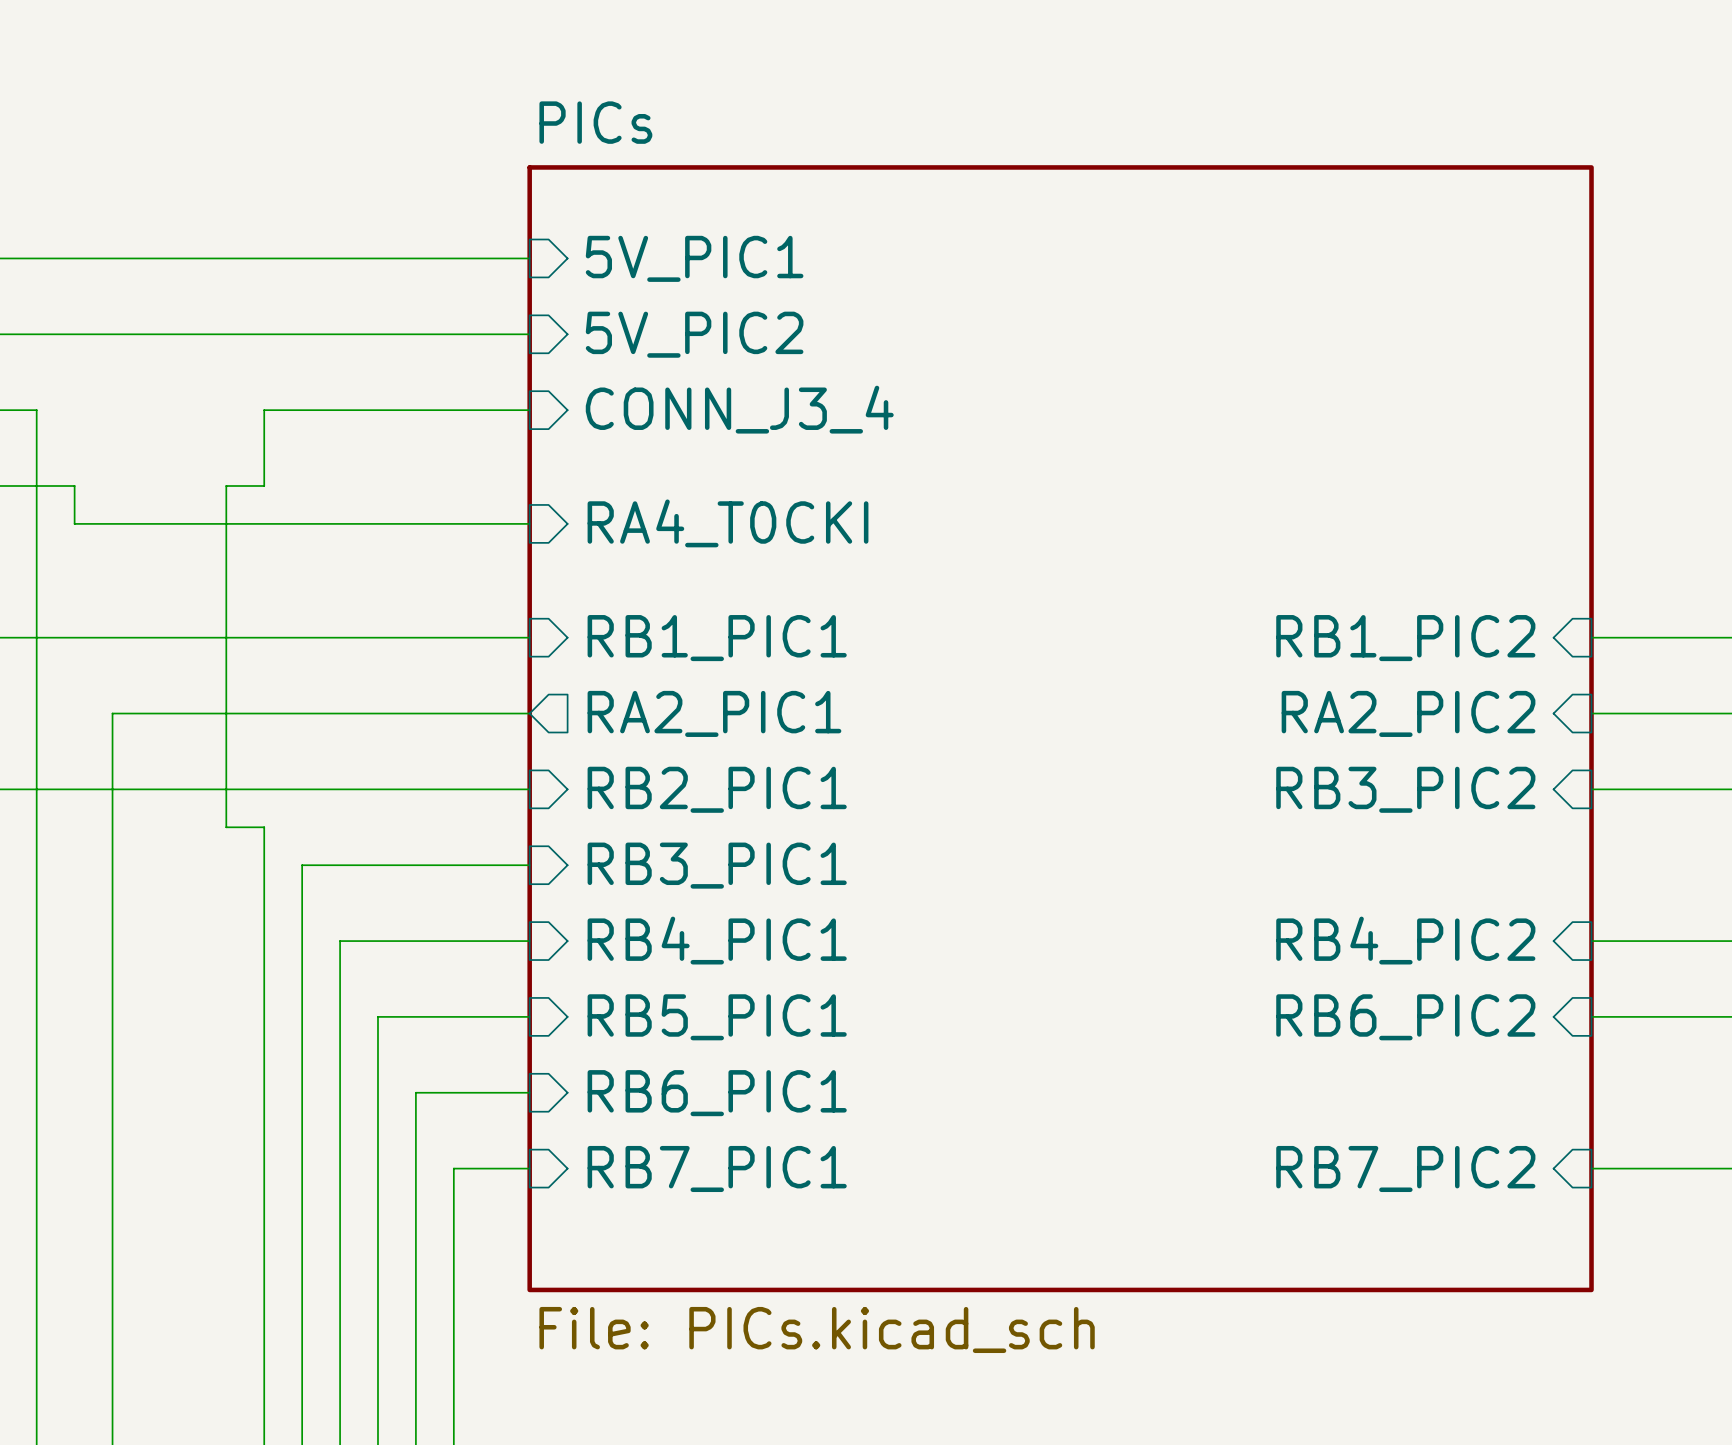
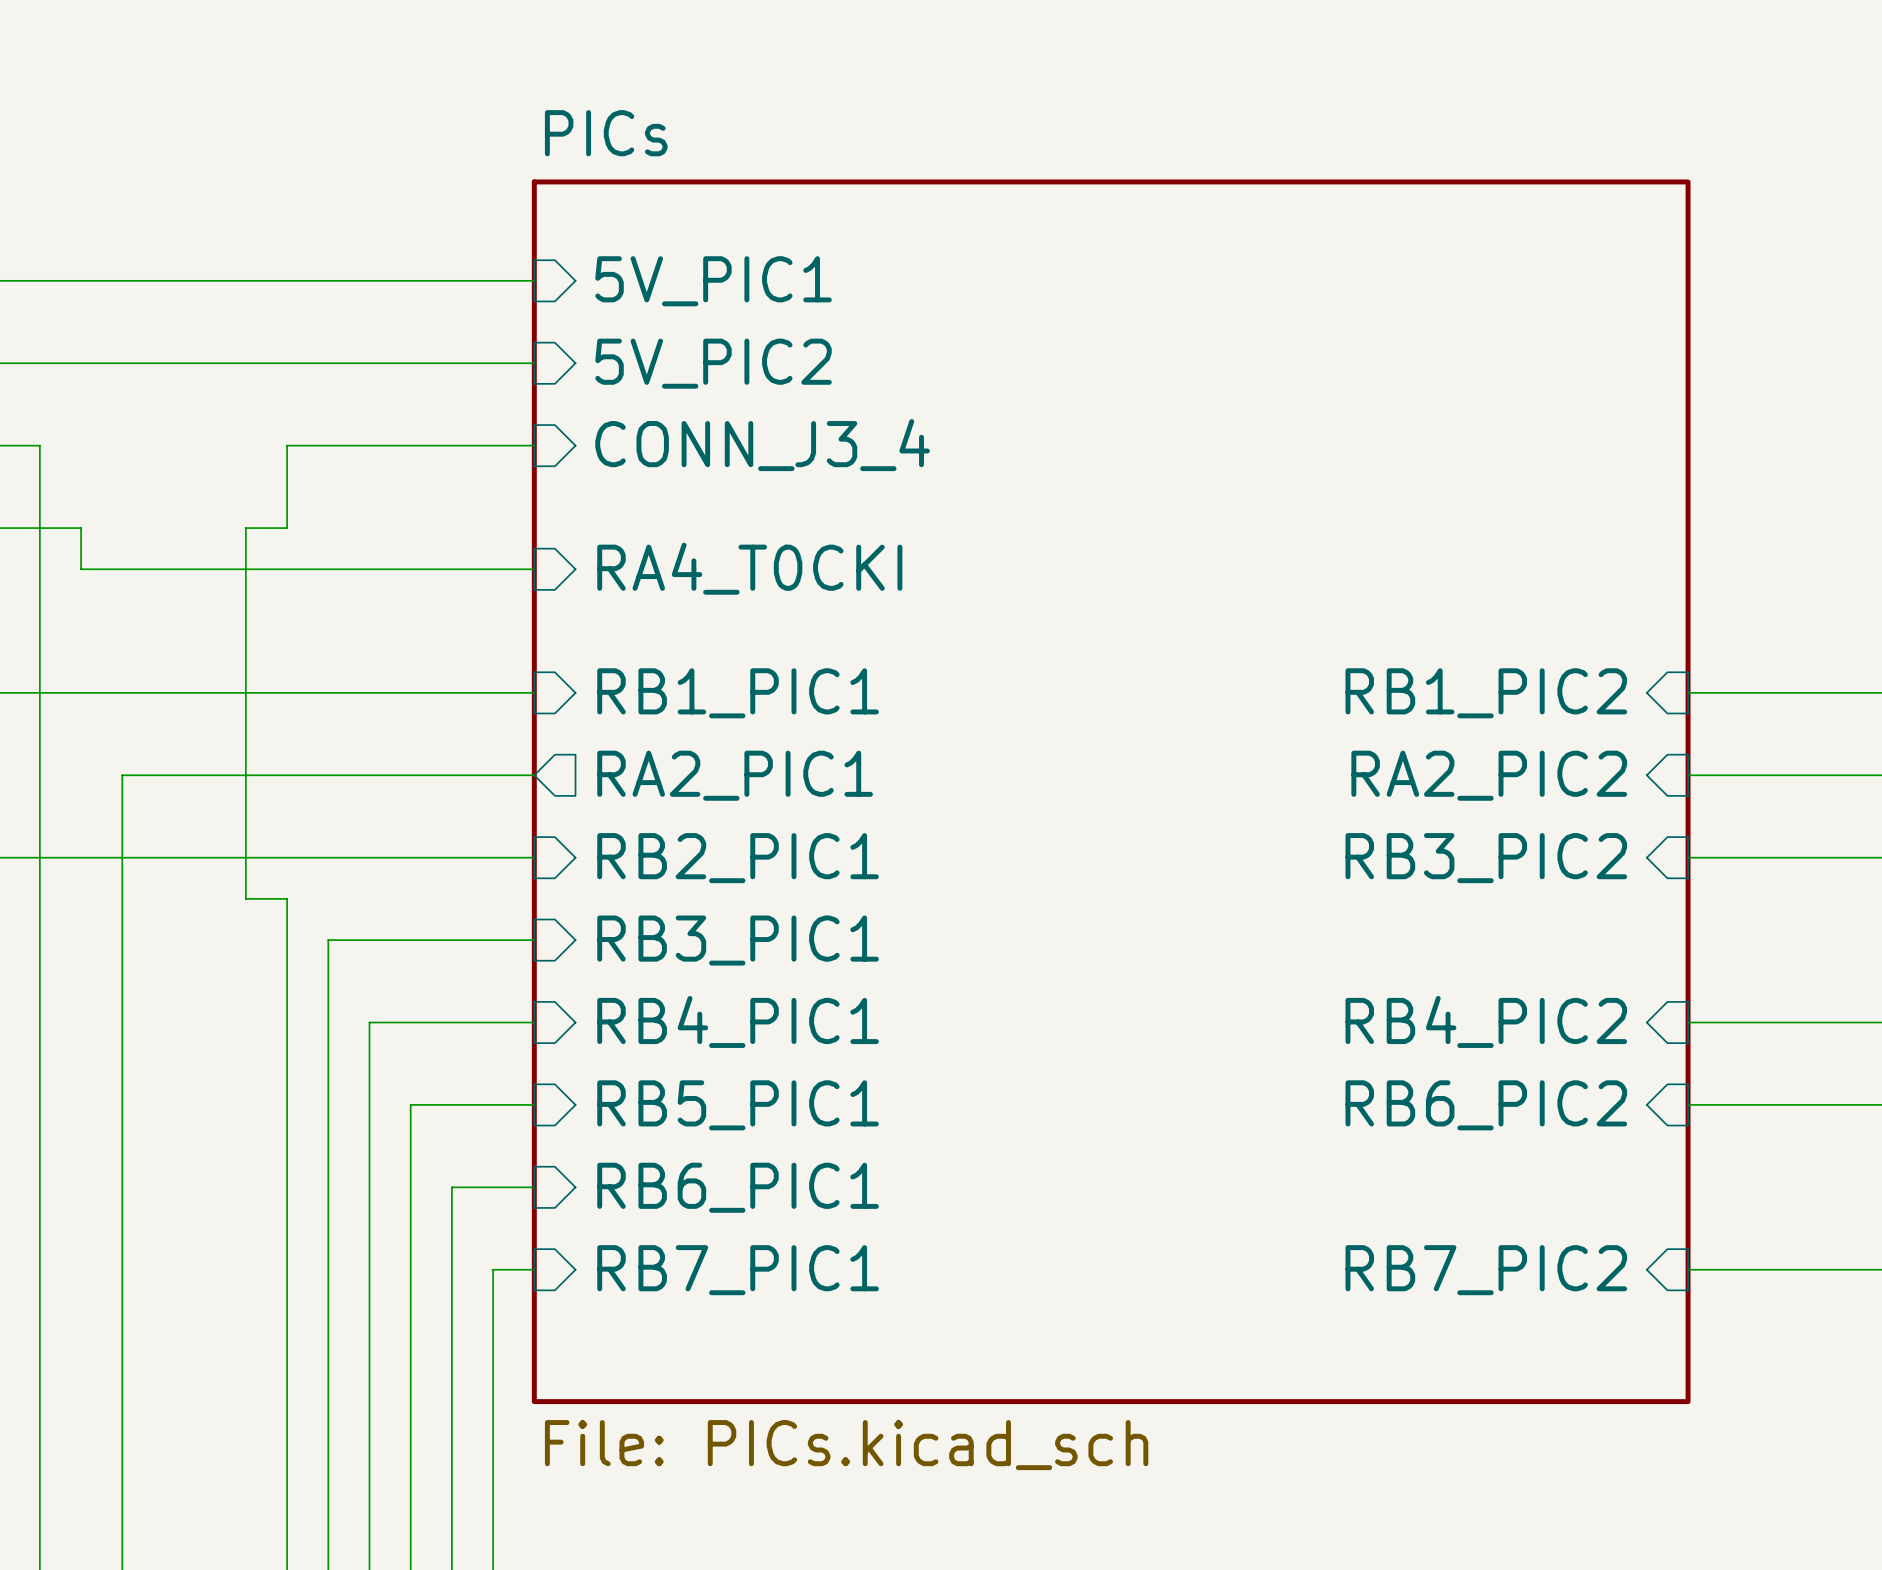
wire: (491, 258) (529, 258) -> none
sheet pin position: 5V_PIC1 (694, 258) -> 5V_PIC1 (713, 281)
wire: (491, 334) (529, 334) -> none
sheet pin position: 5V_PIC2 (694, 334) -> 5V_PIC2 (713, 363)
sheet pin position: CONN_J3_4 (739, 409) -> CONN_J3_4 (762, 445)
wire: (491, 410) (529, 410) -> none
wire: (491, 523) (529, 523) -> none
sheet pin position: RA4_T0CKI (728, 523) -> RA4_T0CKI (749, 568)
wire: (491, 637) (529, 637) -> none
wire: none -> (1688, 692) (1729, 692)
sheet pin position: RB1_PIC1 (717, 638) -> RB1_PIC1 (738, 693)
sheet pin position: RB1_PIC2 (1405, 638) -> RB1_PIC2 (1486, 693)
wire: (491, 713) (529, 713) -> none
sheet pin position: RA2_PIC1 (714, 713) -> RA2_PIC1 (735, 775)
sheet pin position: RA2_PIC2 (1408, 713) -> RA2_PIC2 (1489, 775)
wire: none -> (1688, 775) (1729, 775)
sheet PICs position: (1060, 728) -> (1111, 791)
wire: (491, 789) (529, 789) -> none
sheet pin position: RB2_PIC1 (717, 789) -> RB2_PIC1 (738, 858)
sheet pin position: RB3_PIC2 (1405, 789) -> RB3_PIC2 (1486, 858)
wire: none -> (1688, 857) (1729, 857)
wire: (491, 865) (529, 865) -> none
sheet pin position: RB3_PIC1 (717, 865) -> RB3_PIC1 (738, 940)
sheet pin position: RB4_PIC1 (717, 940) -> RB4_PIC1 (738, 1021)
sheet pin position: RB4_PIC2 (1405, 940) -> RB4_PIC2 (1486, 1021)
wire: (491, 941) (529, 941) -> none
wire: none -> (1688, 1022) (1729, 1022)
wire: (491, 1016) (529, 1016) -> none
wire: none -> (1688, 1104) (1729, 1104)
sheet pin position: RB5_PIC1 (717, 1017) -> RB5_PIC1 (738, 1105)
sheet pin position: RB6_PIC2 (1405, 1017) -> RB6_PIC2 (1486, 1105)
wire: (491, 1092) (529, 1092) -> none
sheet pin position: RB6_PIC1 (717, 1093) -> RB6_PIC1 (738, 1187)
wire: (491, 1168) (529, 1168) -> none
sheet pin position: RB7_PIC1 (717, 1168) -> RB7_PIC1 (738, 1270)
sheet pin position: RB7_PIC2 (1405, 1168) -> RB7_PIC2 (1486, 1270)
wire: none -> (1688, 1269) (1729, 1269)

